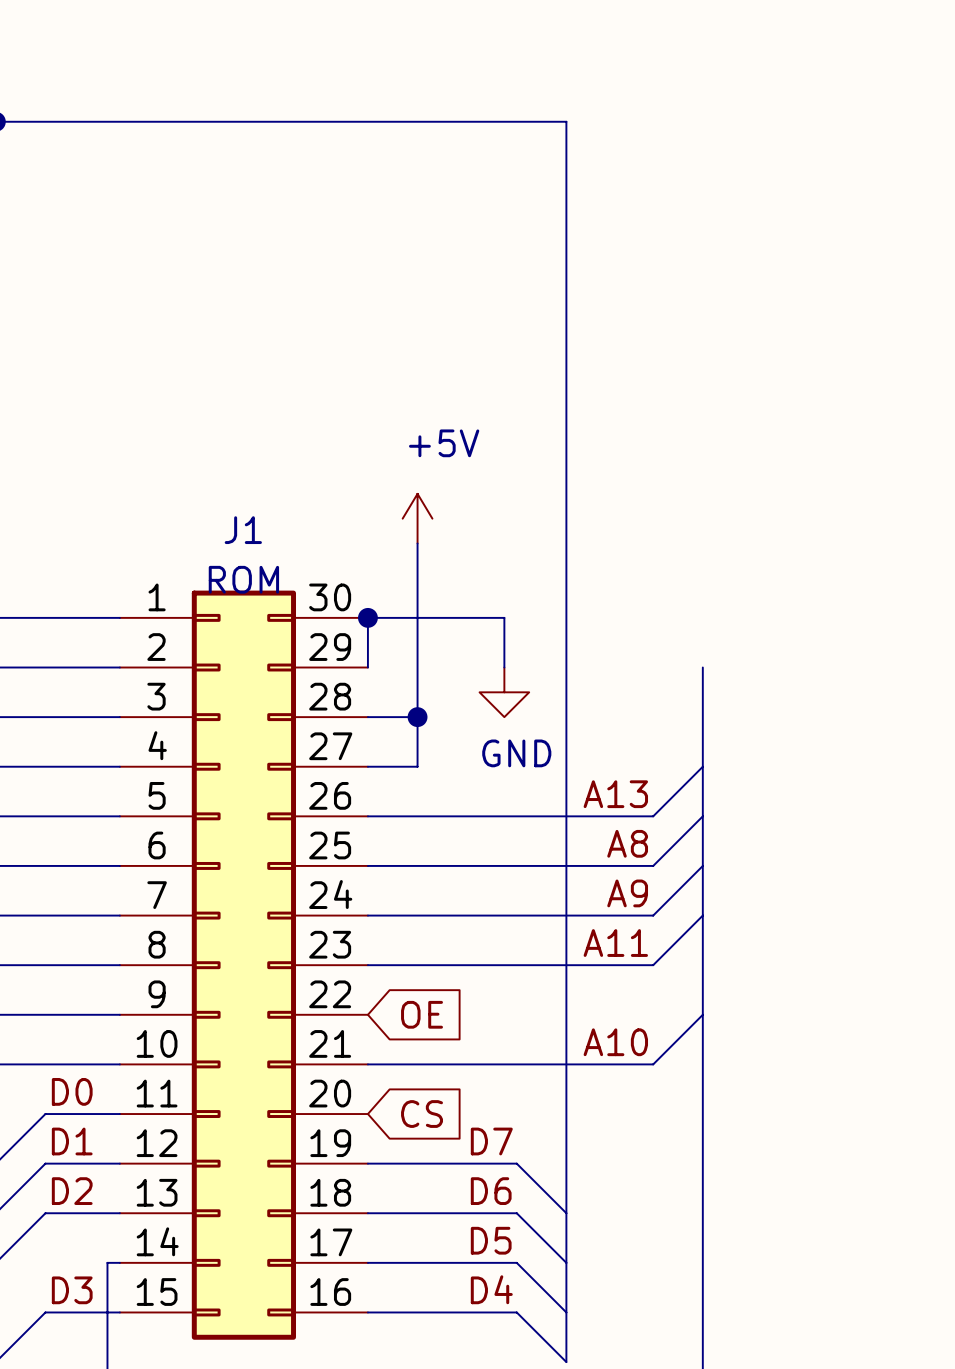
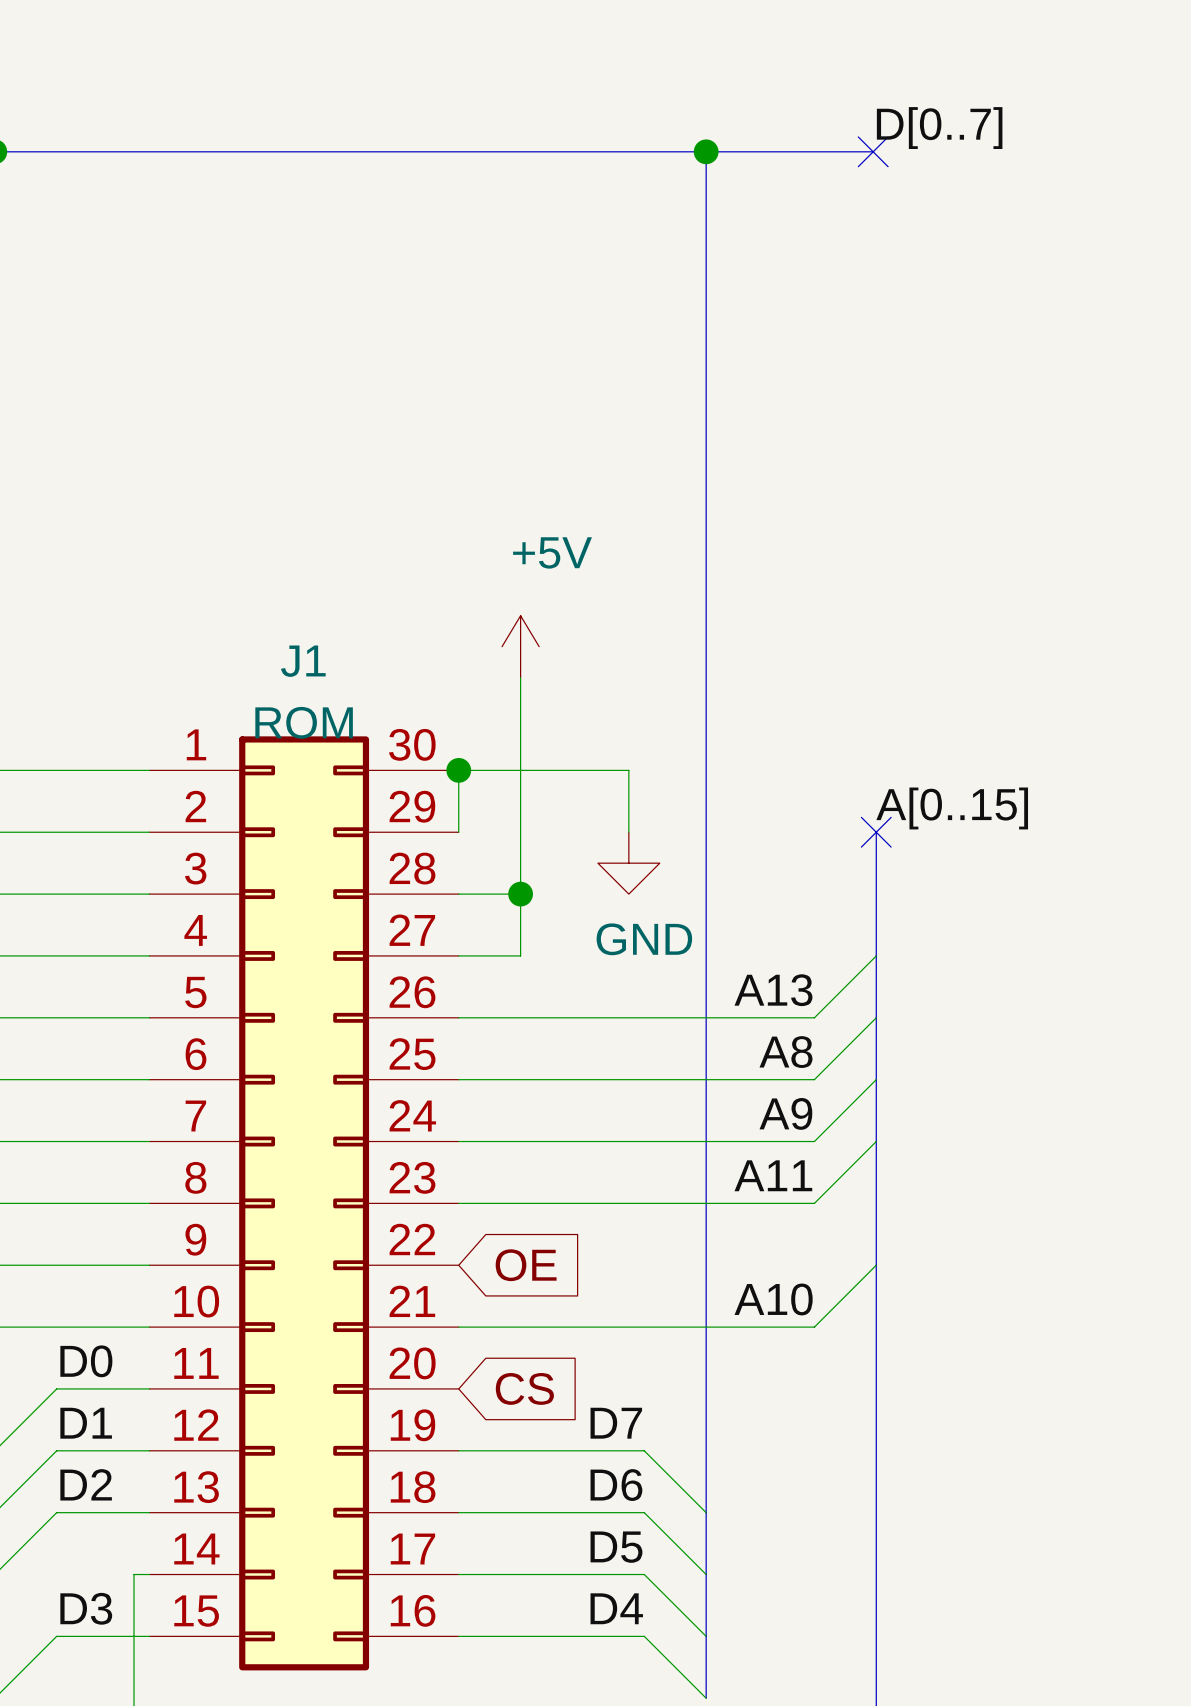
label: none -> D[0..7] (939, 128)
bus: none -> (706, 151) (873, 151)
junction: none -> (706, 151)
no-connect mark: none -> (873, 151)
label: none -> A[0..15] (952, 808)
no-connect mark: none -> (876, 832)

